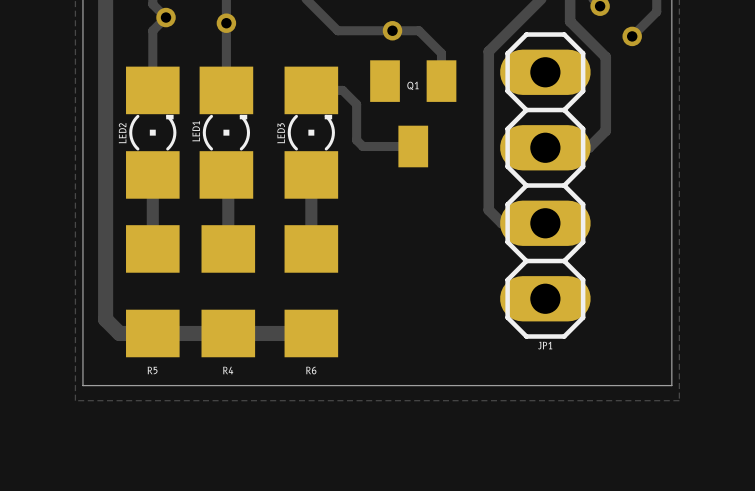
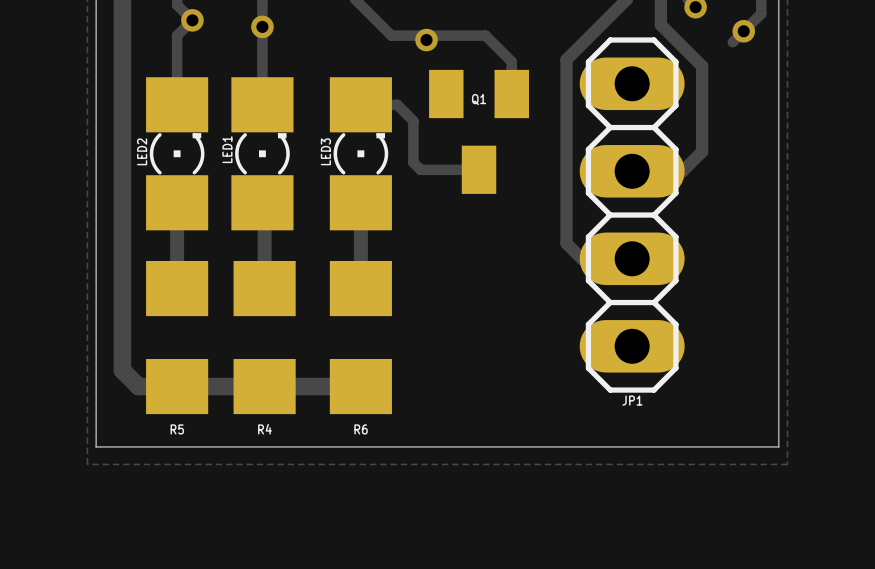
via position: (392, 30) -> (426, 40)
via position: (632, 36) -> (743, 31)

